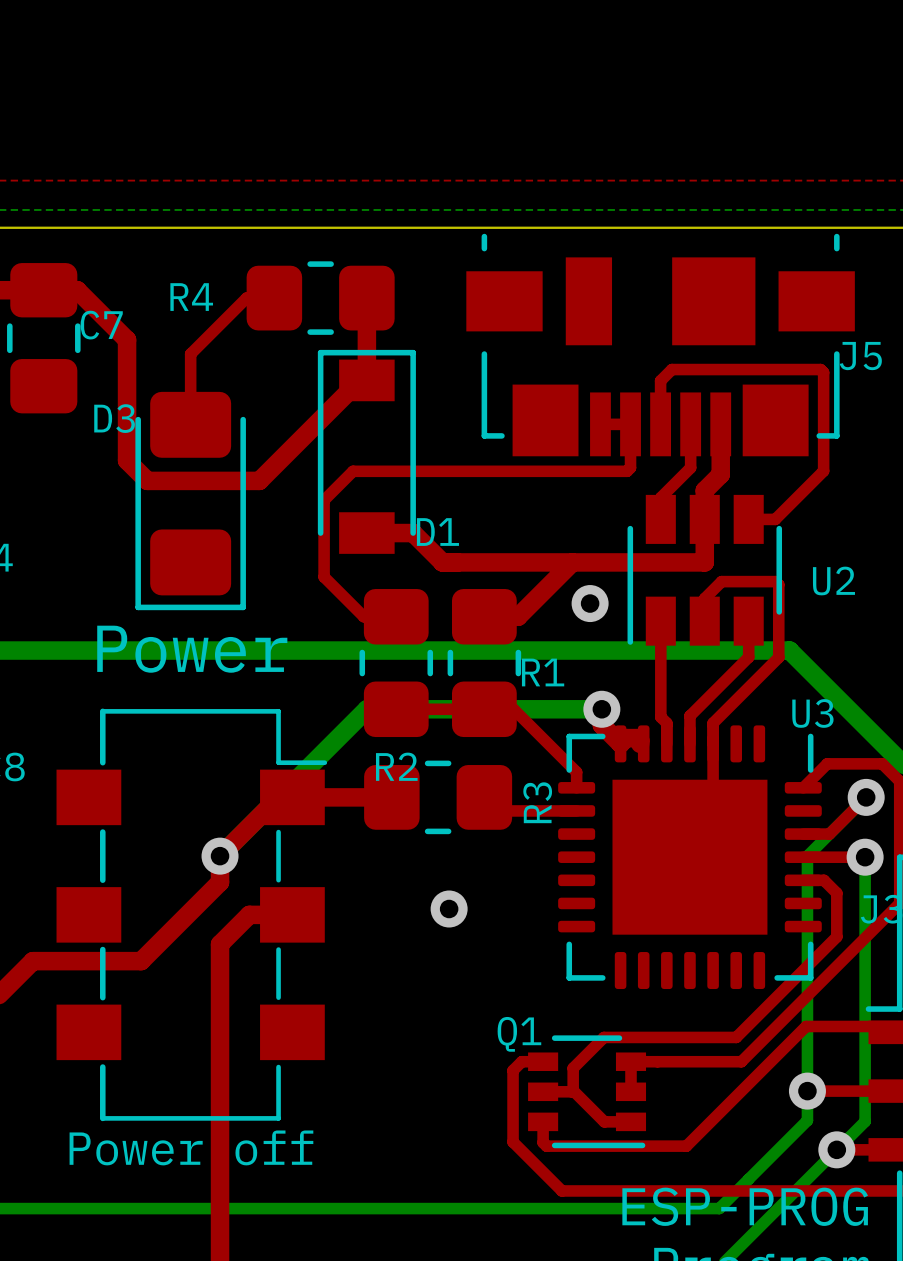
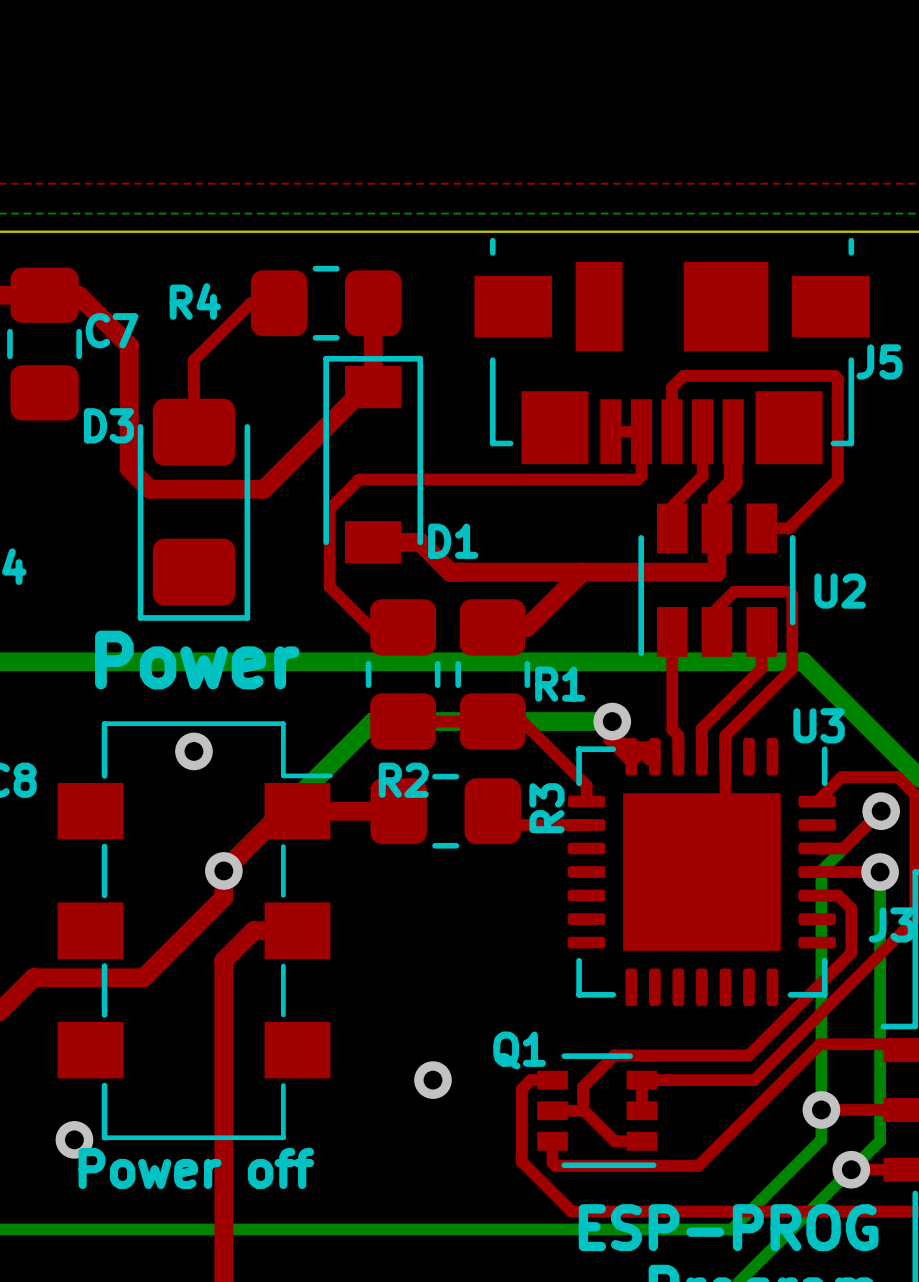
via: (590, 603) -> none
via: none -> (193, 751)
via: (449, 909) -> none
via: none -> (432, 1080)
via: none -> (74, 1139)

